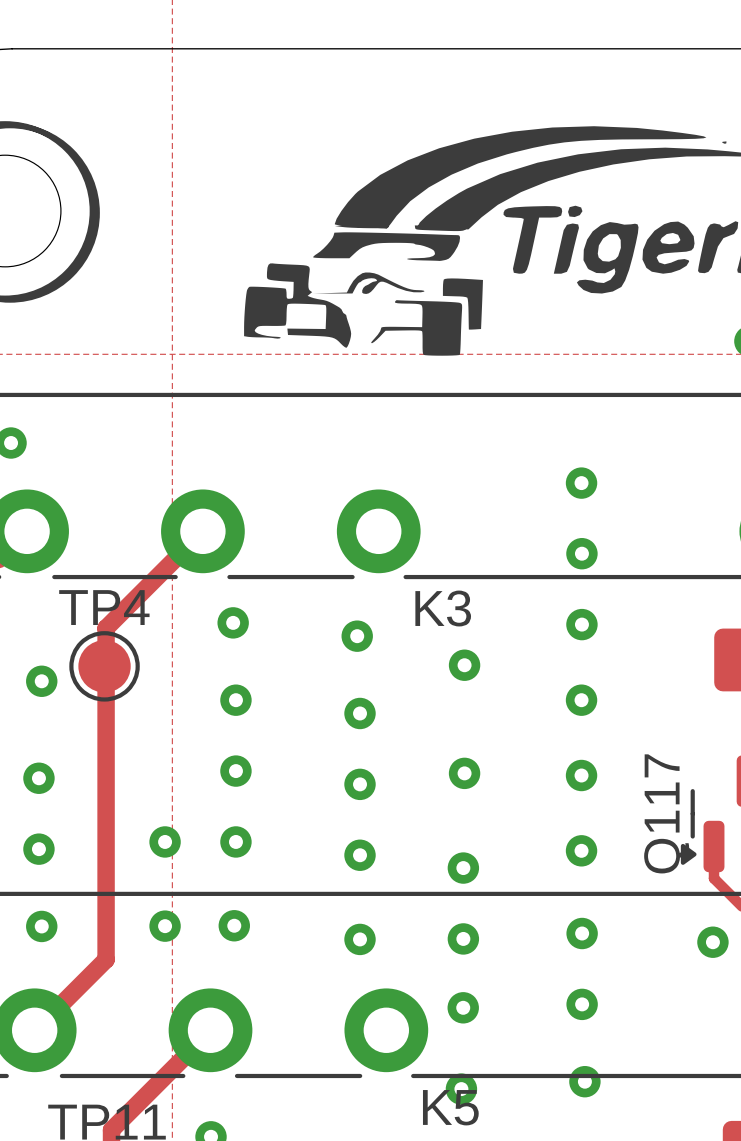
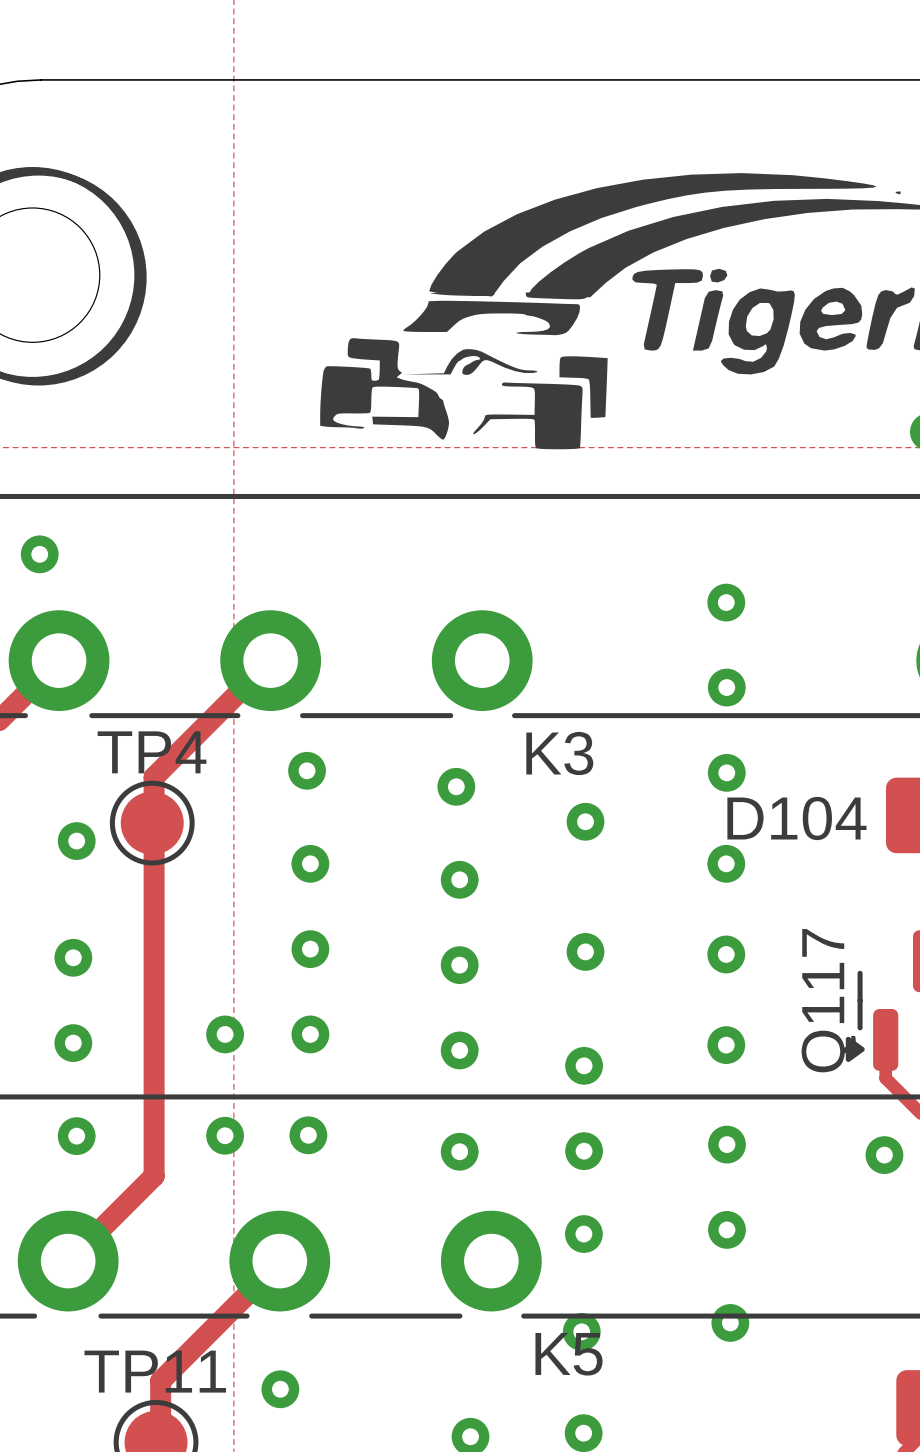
D104 name: none -> D104 (796, 818)

